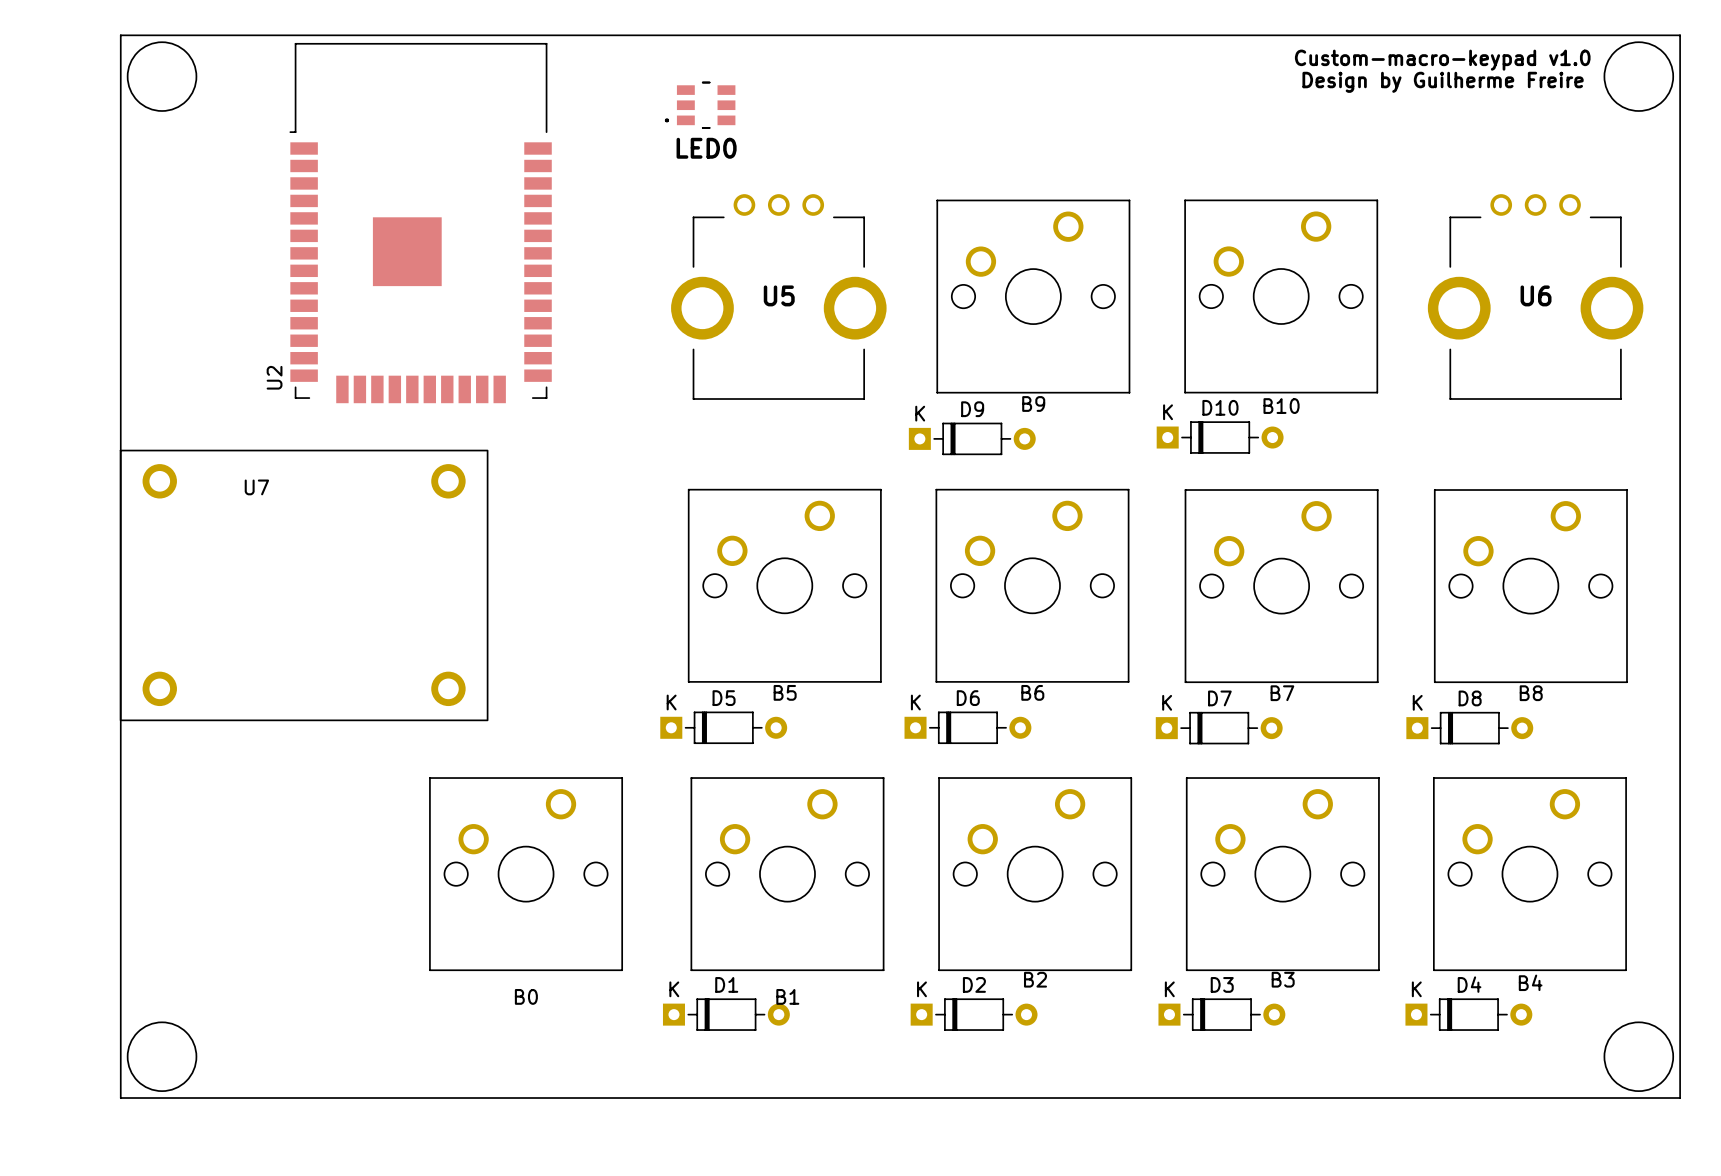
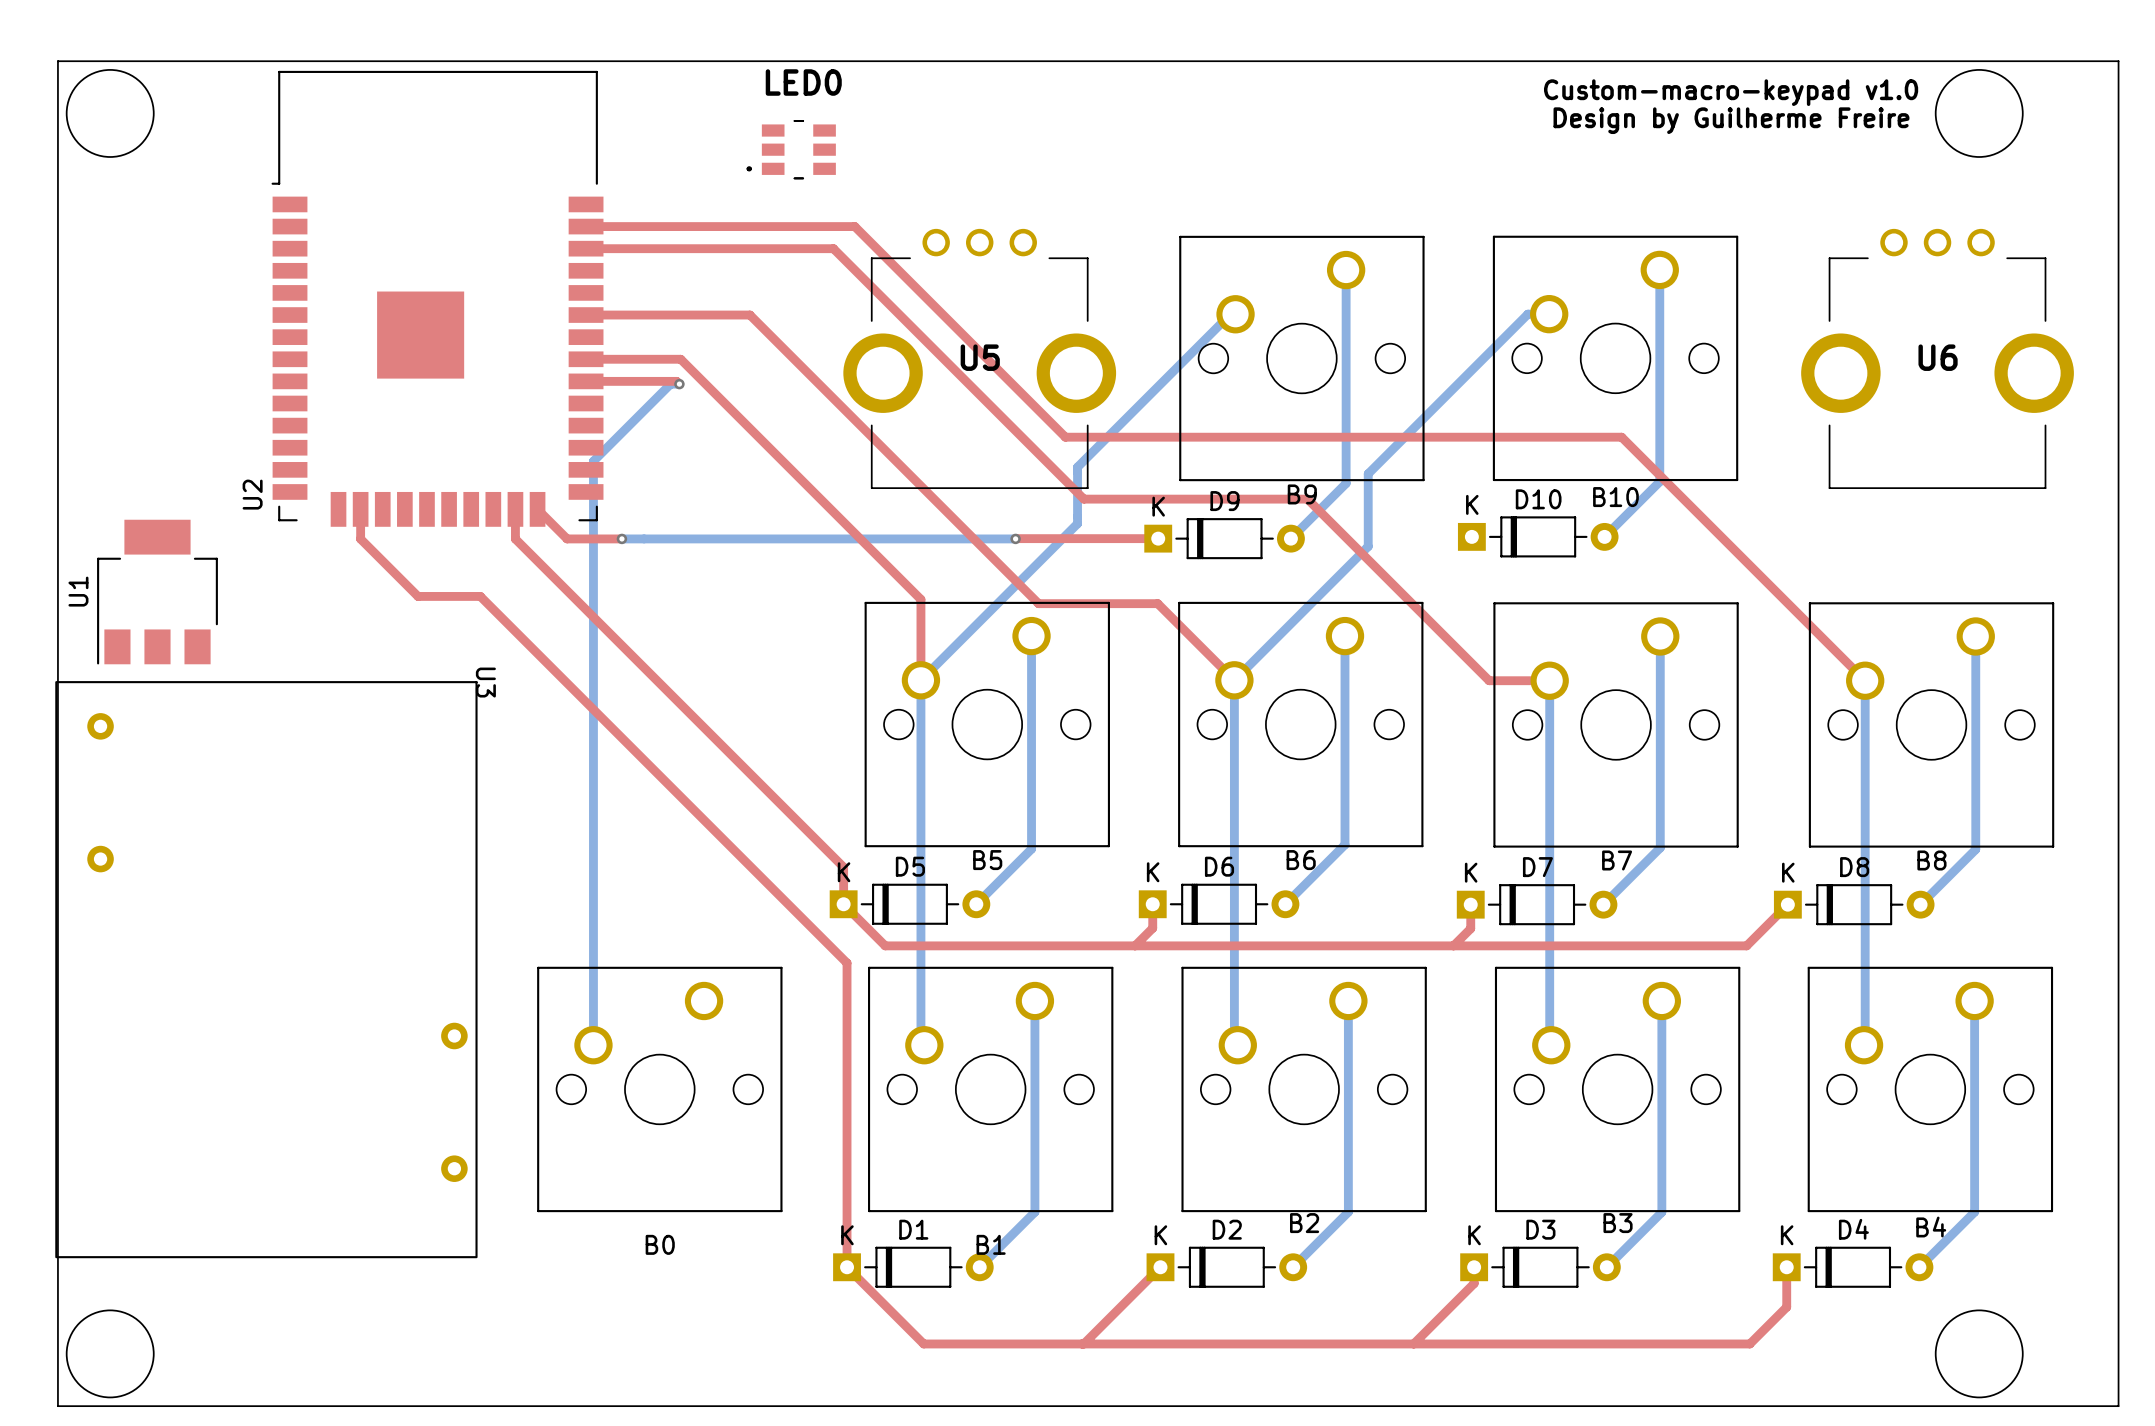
board edge: (120, 35) (1680, 35) (1680, 1098) (120, 1098) (120, 35) -> (57, 61) (57, 1406) (2118, 1406) (2118, 61) (57, 61)
text position: Custom-macro-keypad v1.0 (1442, 60) -> Custom-macro-keypad v1.0 (1731, 92)
round board edge position: (162, 76) -> (110, 113)
round board edge position: (1638, 76) -> (1979, 113)
text position: Design by Guilherme Freire (1443, 82) -> Design by Guilherme Freire (1731, 120)
LED0 position: (700, 105) -> (791, 149)
LED0 name position: LED0 (706, 148) -> LED0 (803, 82)
top track: none -> (586, 226) (854, 226) (1065, 437) (1621, 437) (1865, 680)
top track: none -> (586, 248) (833, 248) (1083, 499) (1307, 499) (1489, 680) (1549, 680)
U2 position: (420, 223) -> (437, 298)
bottom track: none -> (1346, 270) (1346, 483) (1290, 538)
bottom track: none -> (1659, 269) (1659, 481) (1604, 536)
bottom track: none -> (1235, 314) (1230, 314) (1077, 467) (1077, 523) (920, 680) (920, 1041) (924, 1045)
bottom track: none -> (1549, 314) (1527, 314) (1368, 473) (1368, 546) (1234, 680) (1234, 1041) (1237, 1045)
top track: none -> (586, 315) (749, 315) (1038, 603) (1157, 603) (1234, 680)
top track: none -> (586, 359) (680, 359) (920, 599) (920, 680)
top track: none -> (586, 381) (676, 381) (679, 384)
bottom track: none -> (679, 384) (670, 384) (593, 461) (593, 1045)
via: none -> (679, 384)
top track: none -> (360, 509) (360, 539) (418, 596) (480, 596) (847, 963) (847, 1267) (923, 1343) (1749, 1343) (1786, 1307) (1786, 1267)
top track: none -> (515, 509) (515, 539) (843, 867) (843, 904) (885, 945) (1746, 945) (1787, 904)
top track: none -> (537, 509) (567, 538) (621, 538)
top track: none -> (1158, 538) (1015, 538)
bottom track: none -> (621, 538) (1015, 538)
via: none -> (621, 538)
via: none -> (1015, 538)
U1: none -> (157, 592)
bottom track: none -> (1031, 636) (1031, 849) (976, 904)
bottom track: none -> (1344, 636) (1344, 844) (1285, 904)
bottom track: none -> (1660, 636) (1660, 847) (1603, 904)
bottom track: none -> (1975, 636) (1975, 849) (1920, 904)
bottom track: none -> (1549, 680) (1549, 1043) (1551, 1045)
bottom track: none -> (1865, 680) (1864, 1045)
U7: (304, 585) -> none
top track: none -> (1152, 904) (1152, 928) (1135, 945)
top track: none -> (1470, 904) (1470, 928) (1453, 945)
U3: none -> (266, 969)
bottom track: none -> (1034, 1000) (1034, 1212) (979, 1267)
bottom track: none -> (1348, 1000) (1348, 1212) (1293, 1267)
bottom track: none -> (1661, 1000) (1661, 1212) (1606, 1267)
bottom track: none -> (1974, 1000) (1974, 1212) (1919, 1267)
top track: none -> (1160, 1267) (1083, 1343)
top track: none -> (1474, 1267) (1474, 1283) (1413, 1343)
round board edge position: (162, 1056) -> (110, 1353)
round board edge position: (1638, 1056) -> (1979, 1353)

